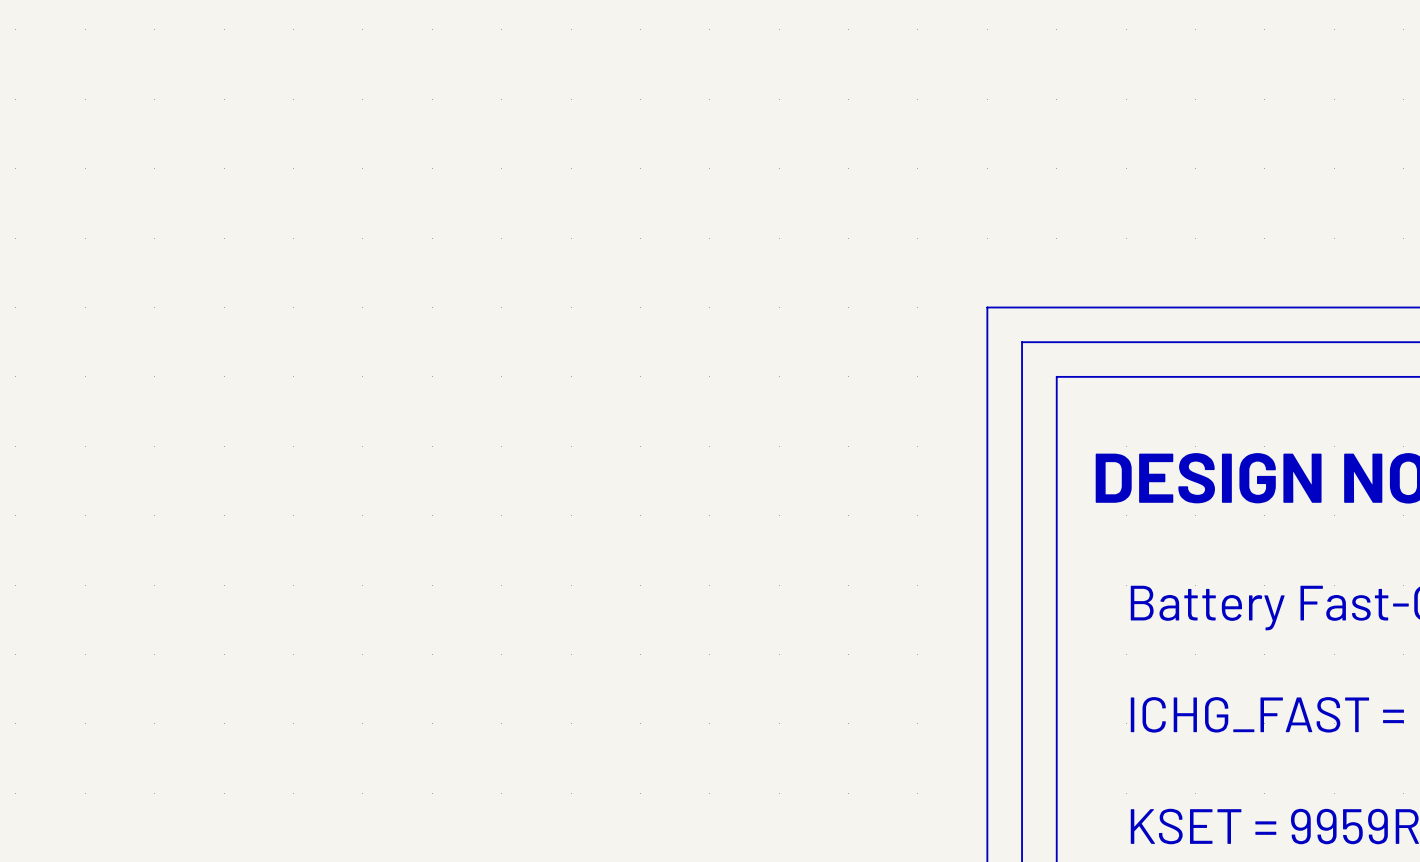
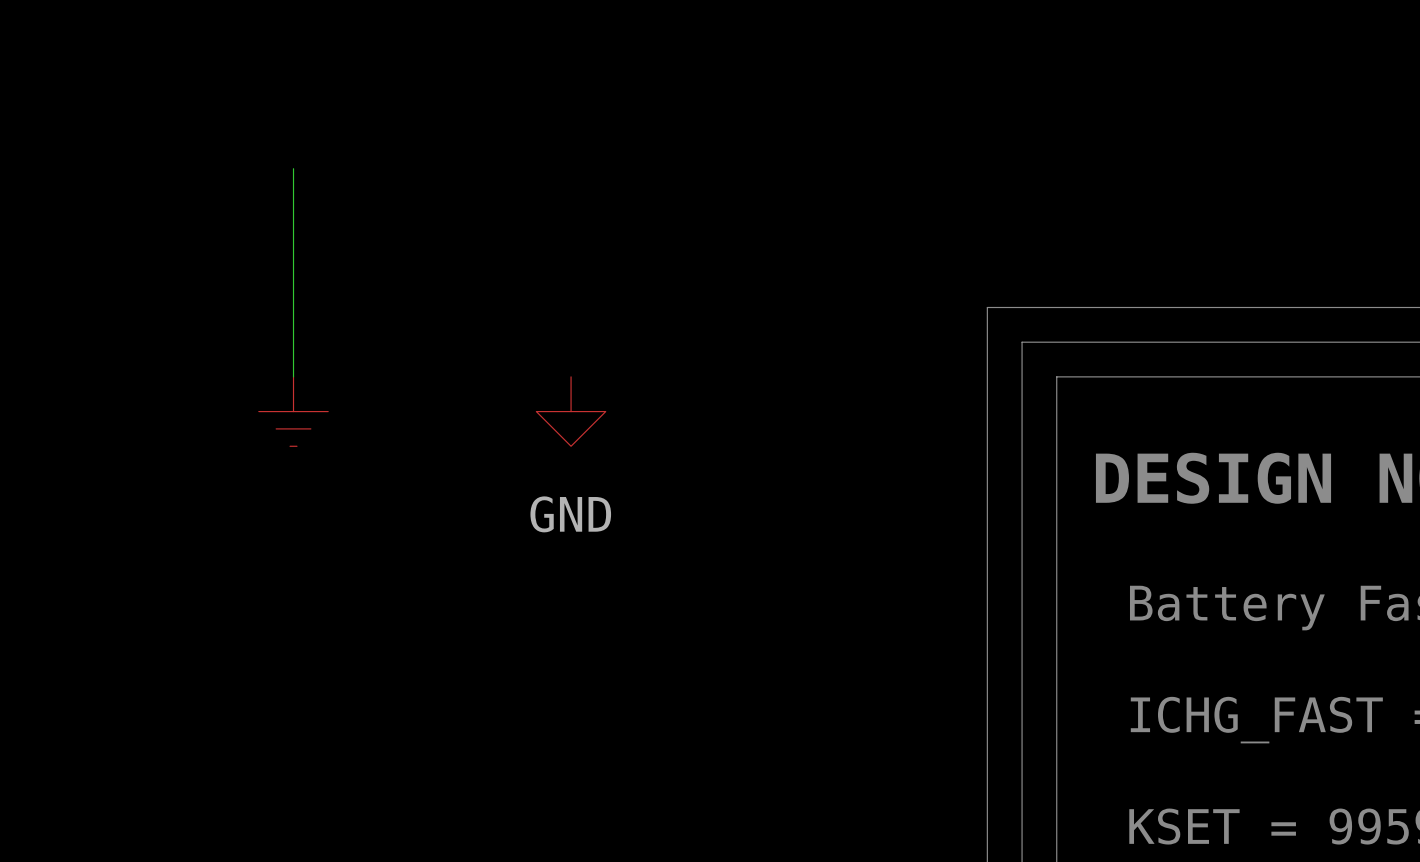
wire: none -> (293, 168) (293, 376)
power symbol: none -> (293, 411)
power symbol: none -> GND (571, 411)

